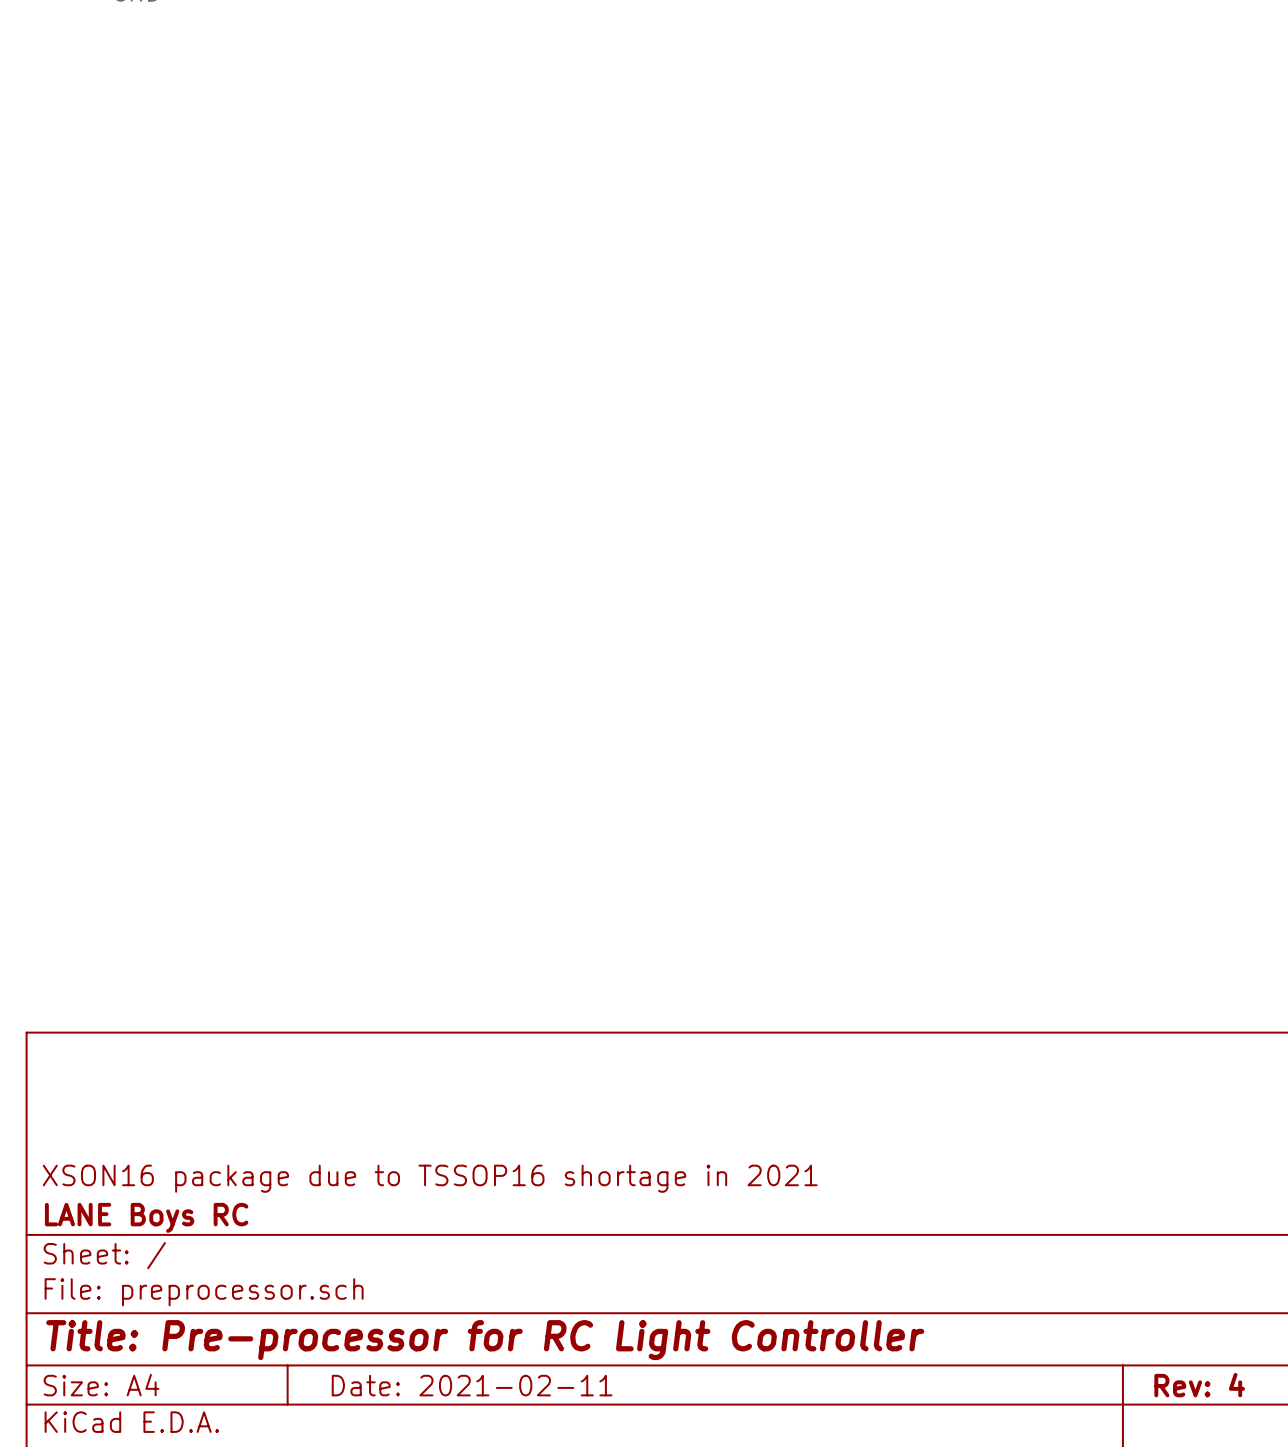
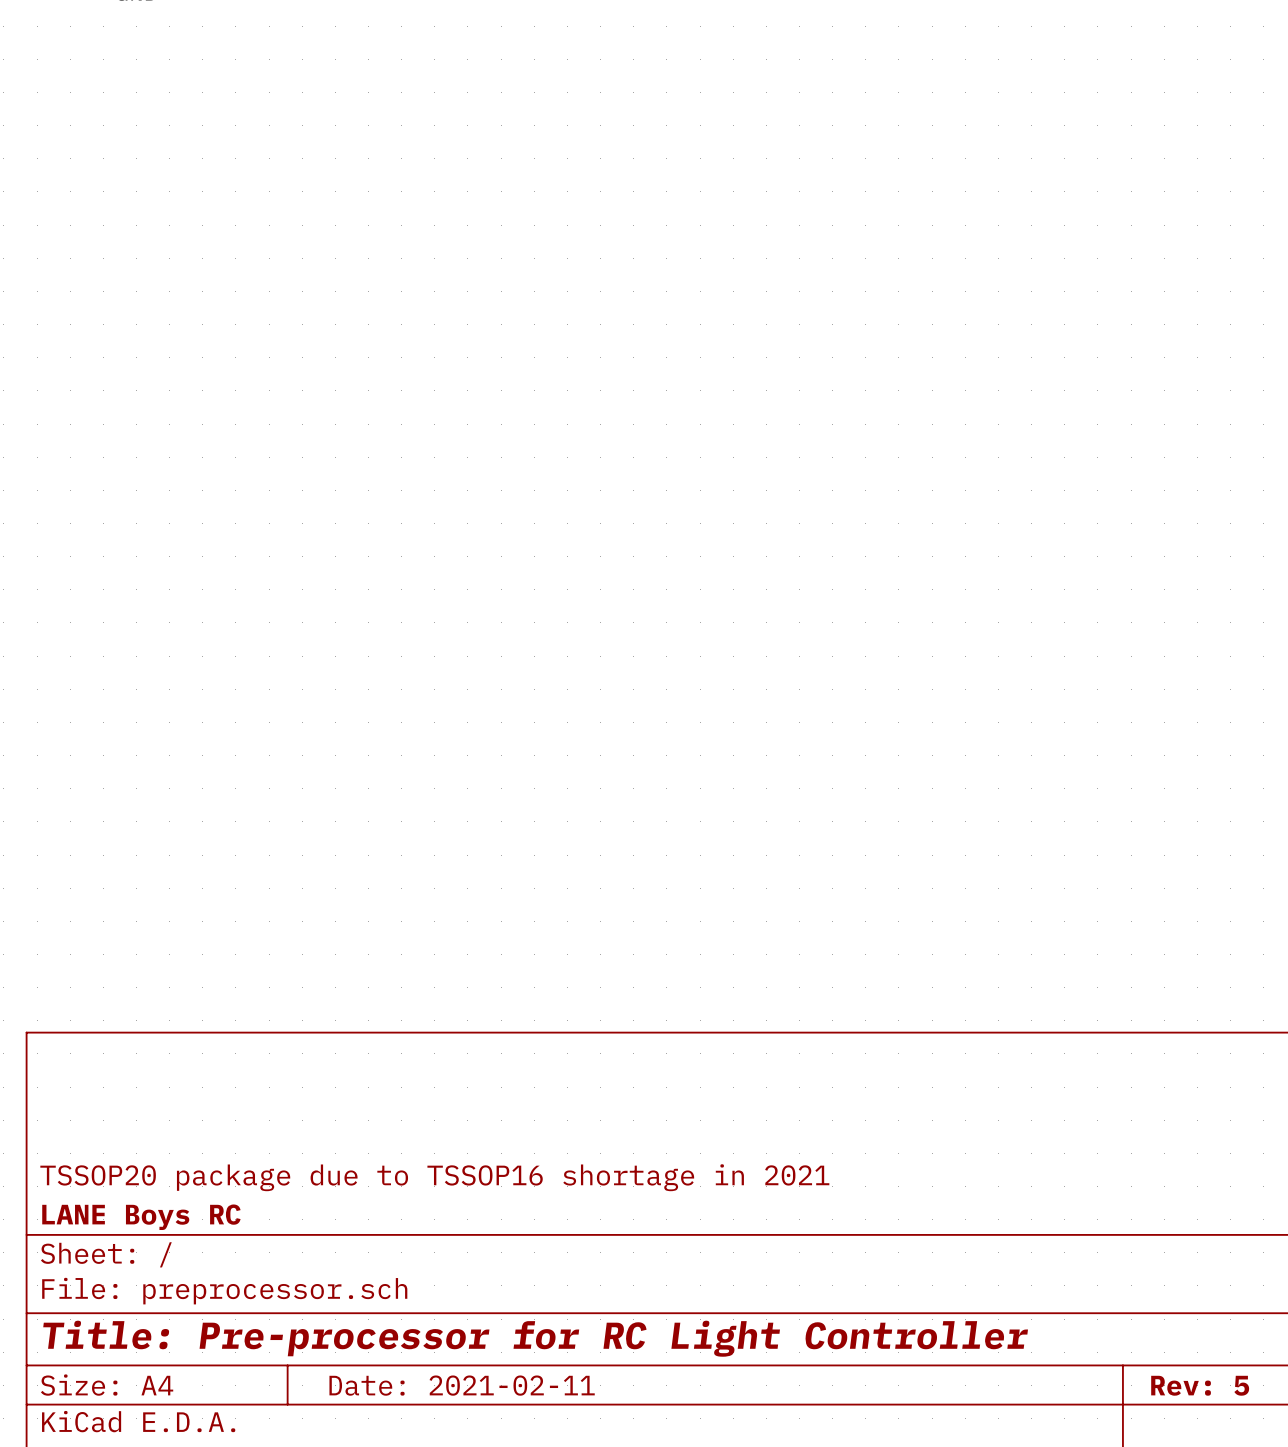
title block: XSON16 package due to TSSOP16 shortage in 2021 (430, 1178) -> TSSOP20 package due to TSSOP16 shortage in 2021 (434, 1177)
title block: Rev: 4 (1199, 1385) -> Rev: 5 (1200, 1385)

